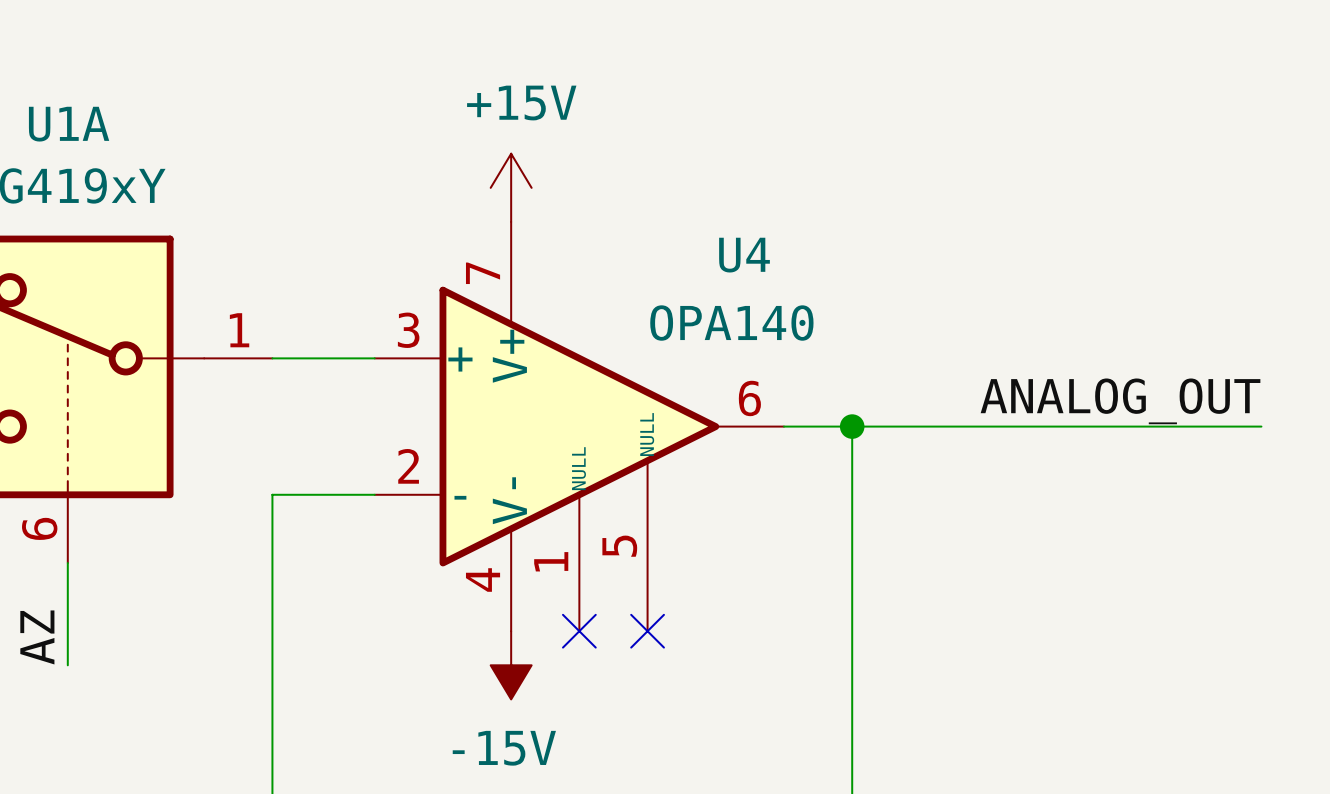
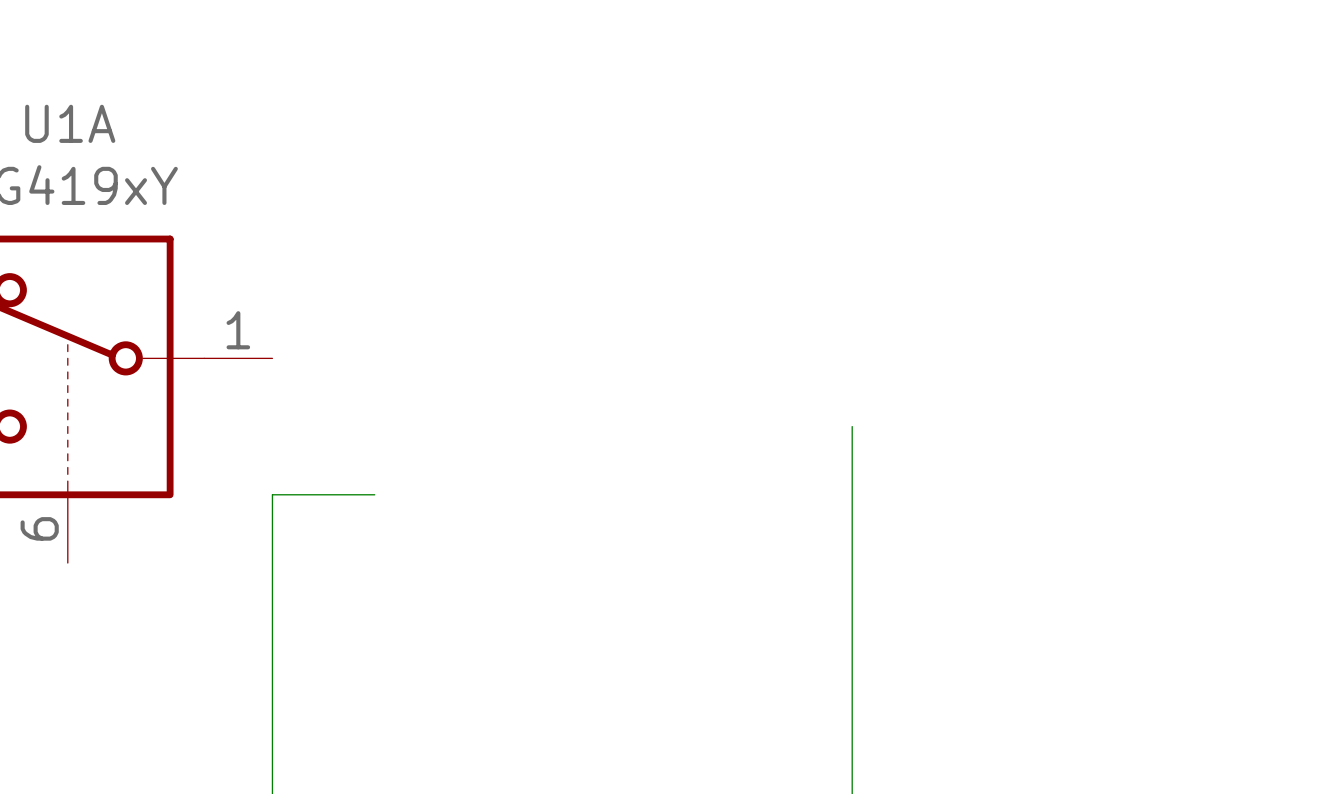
power symbol: +15V (511, 187) -> none
wire: (272, 358) (374, 358) -> none
label: ANALOG_OUT (1120, 401) -> none
U4: OPA140 (579, 426) -> none
wire: (783, 426) (1261, 426) -> none
junction: (852, 426) -> none
wire: (67, 563) (67, 665) -> none
no-connect mark: (579, 631) -> none
no-connect mark: (647, 631) -> none
label: AZ (37, 637) -> none
power symbol: -15V (511, 665) -> none

